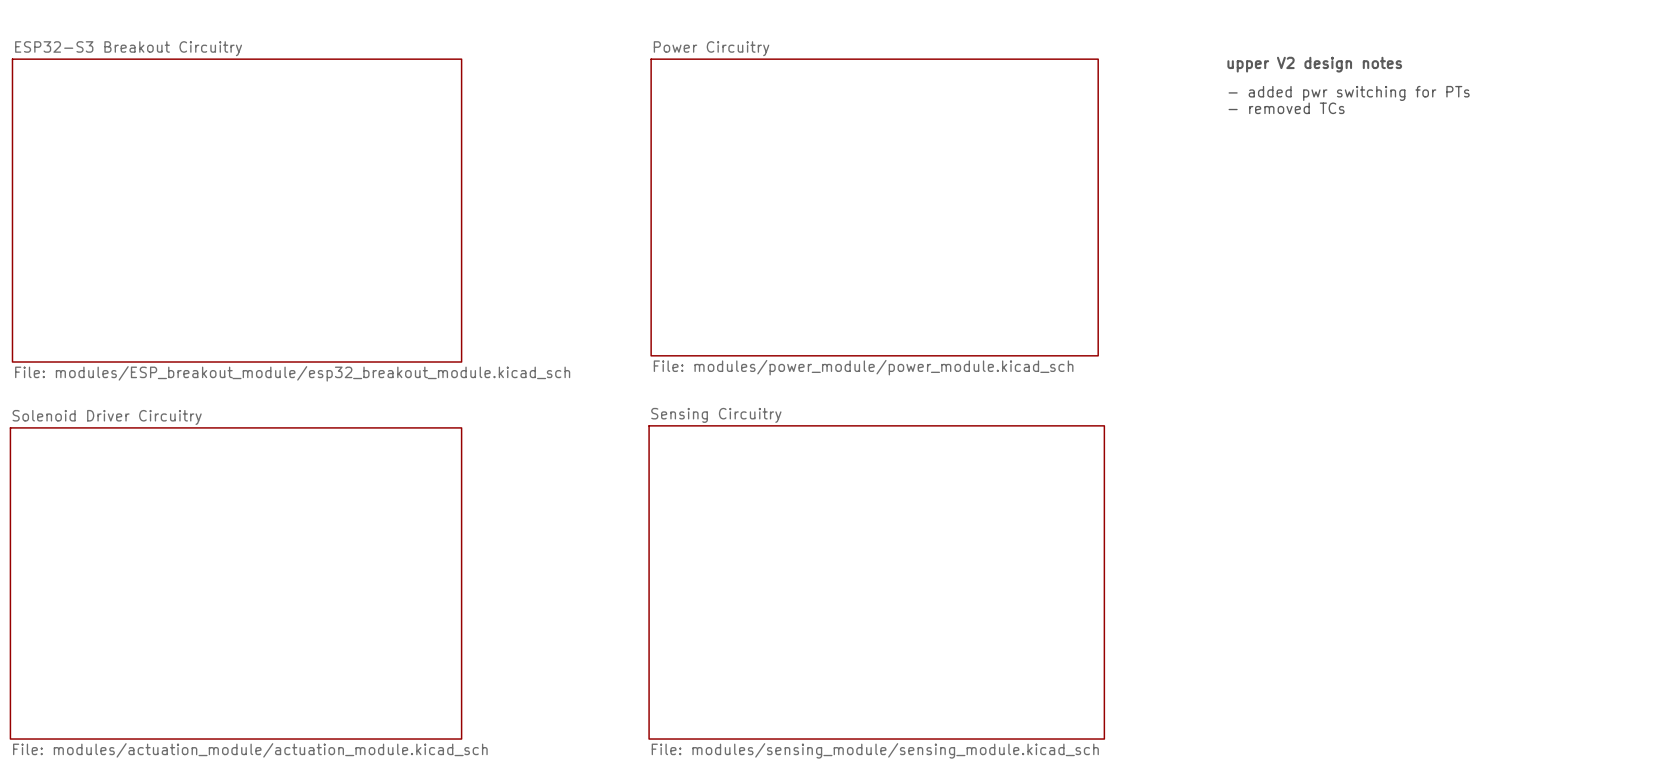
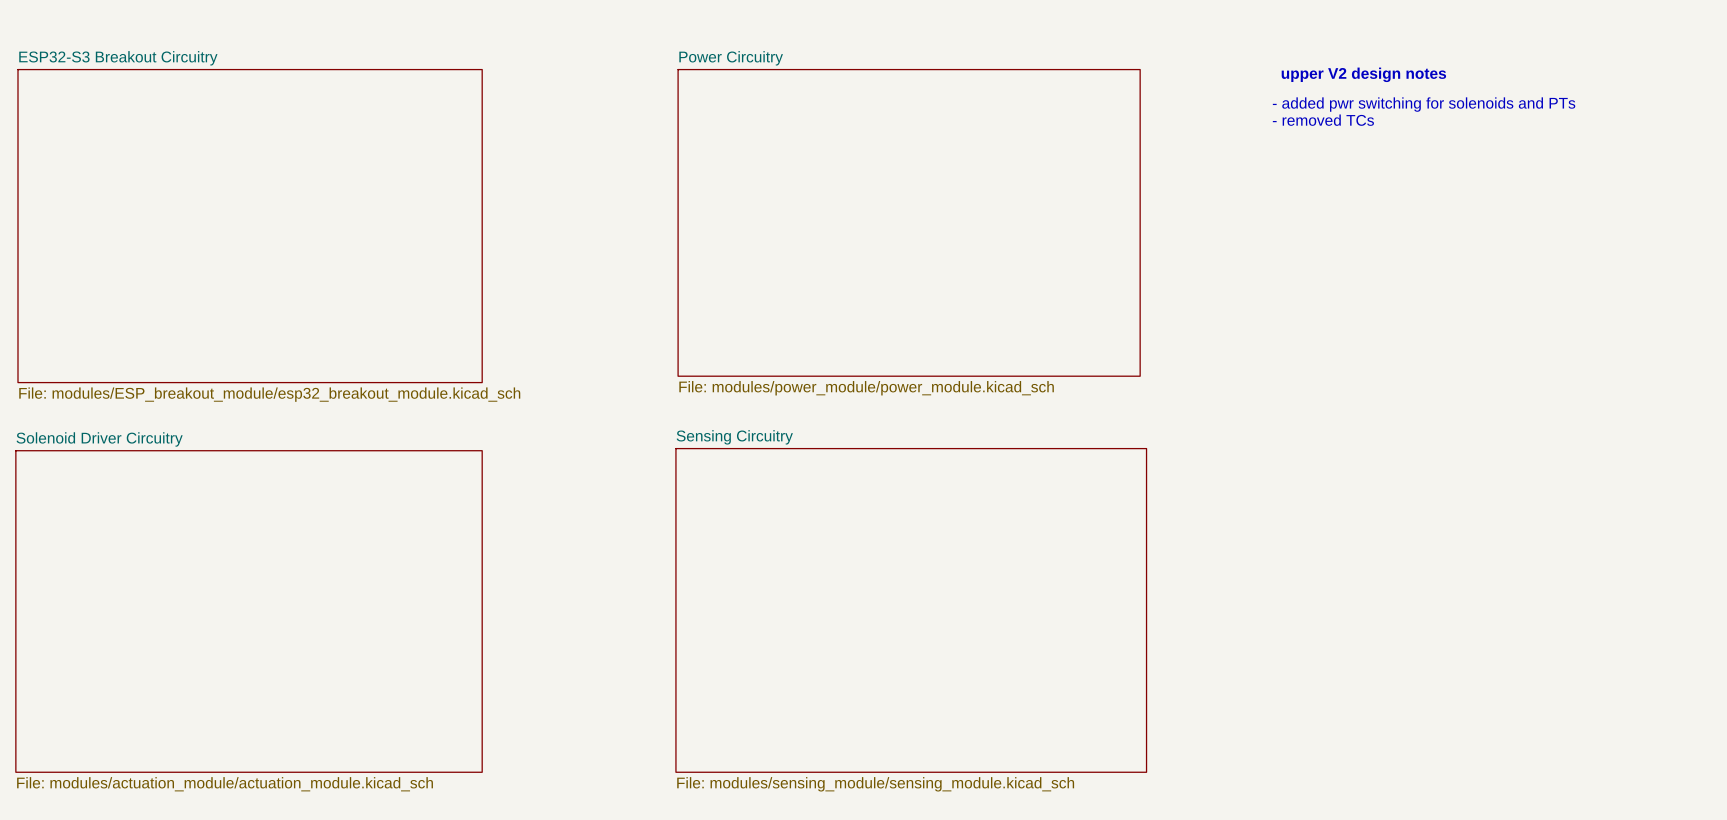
text: - added pwr switching for PTs (1349, 93) -> - added pwr switching for solenoids and PTs (1424, 104)

